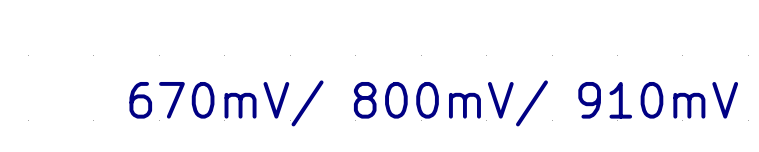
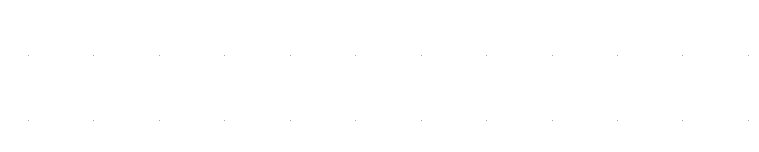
text: 670mV/ 800mV/ 910mV (433, 103) -> none

